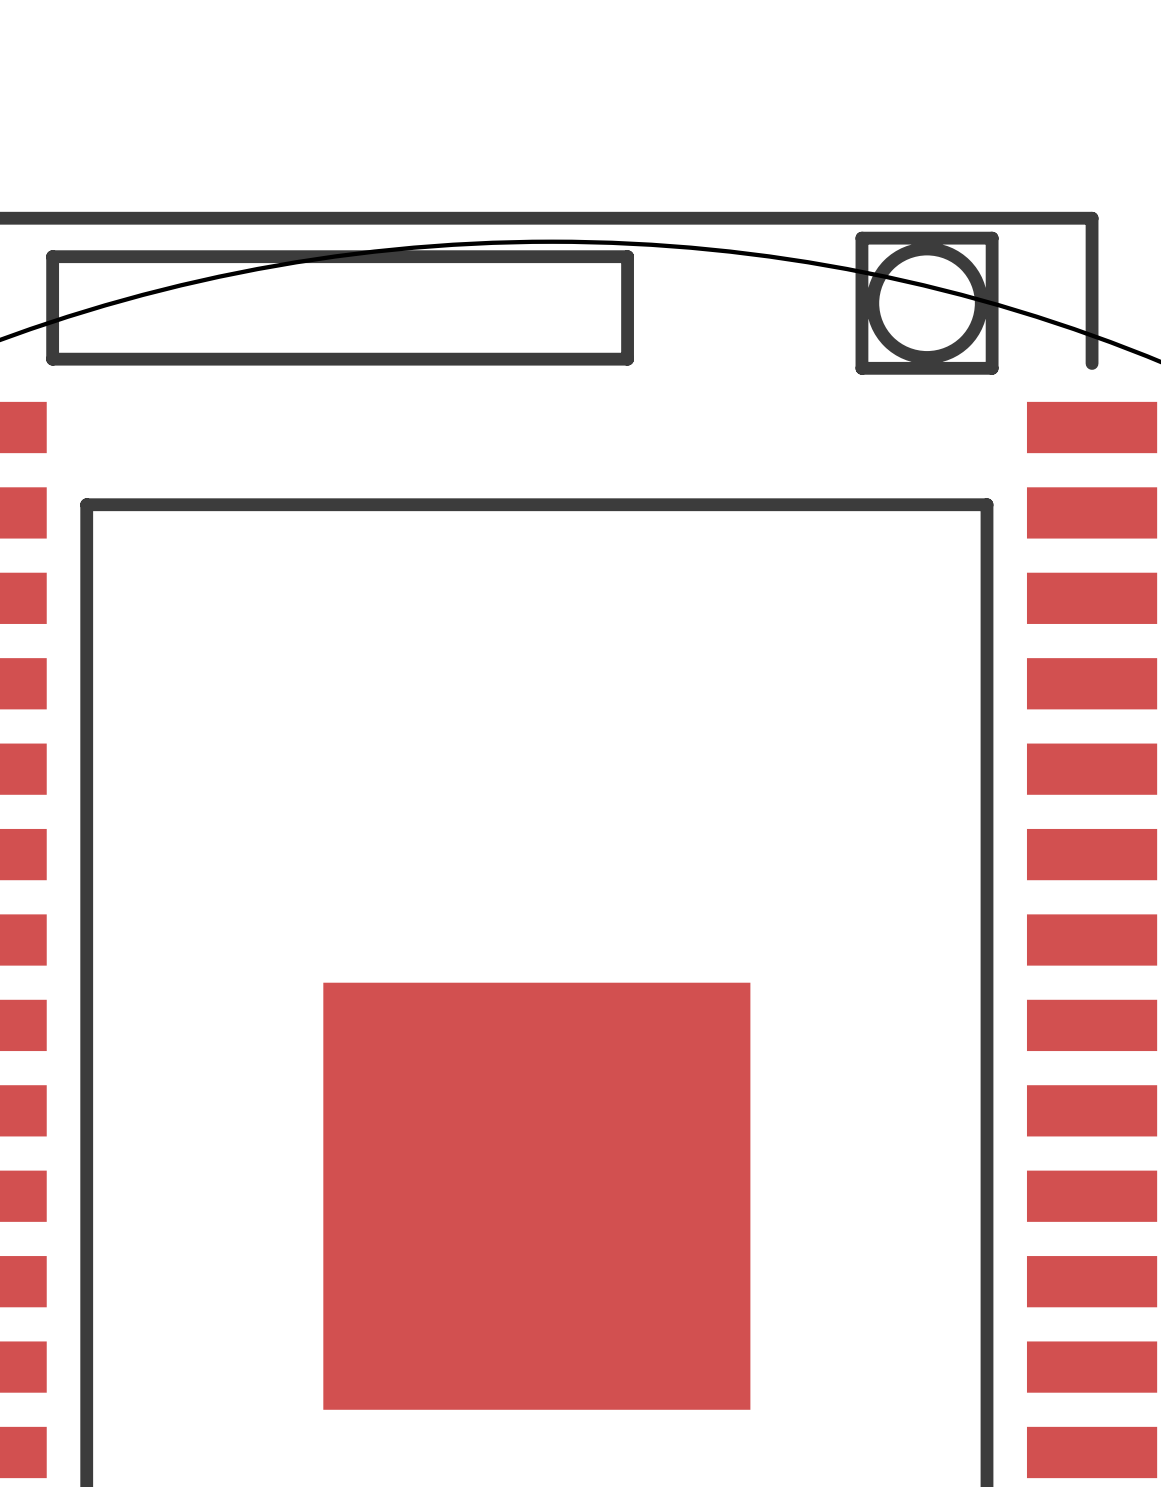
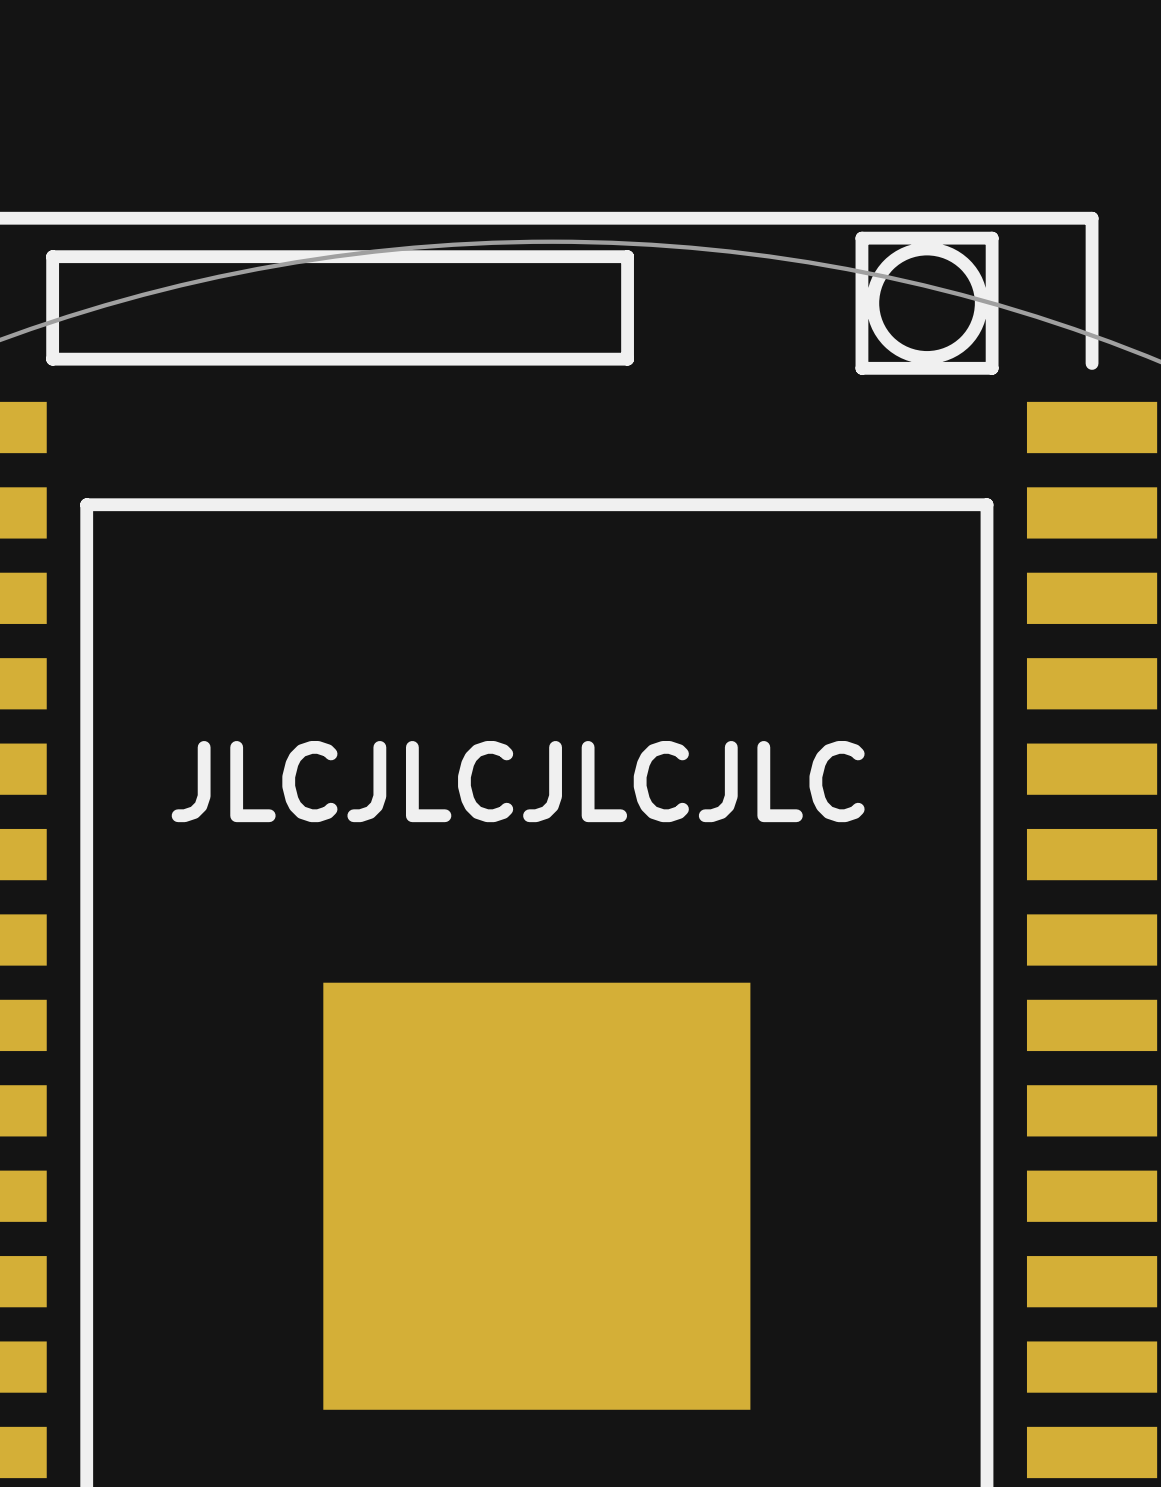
text: none -> JLCJLCJLCJLC (518, 781)

